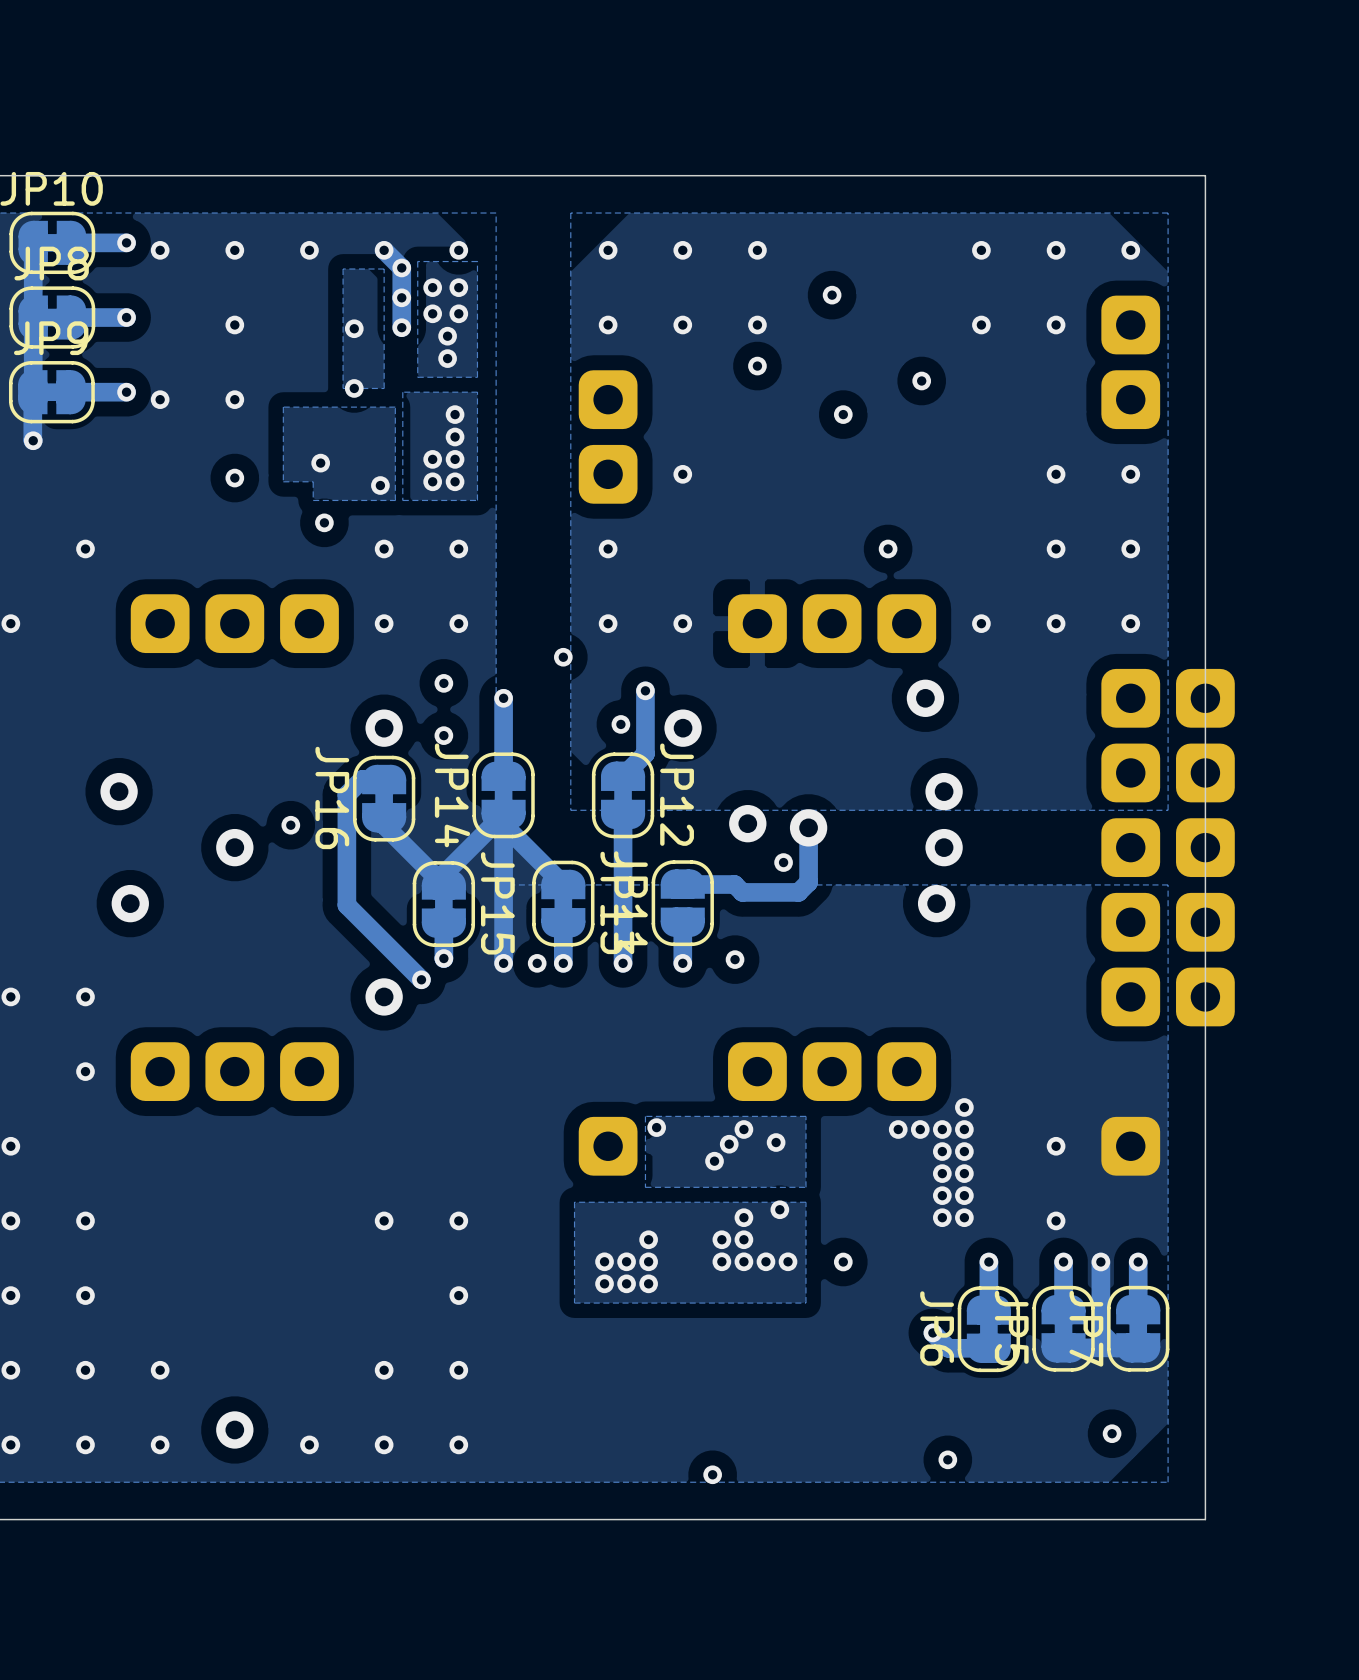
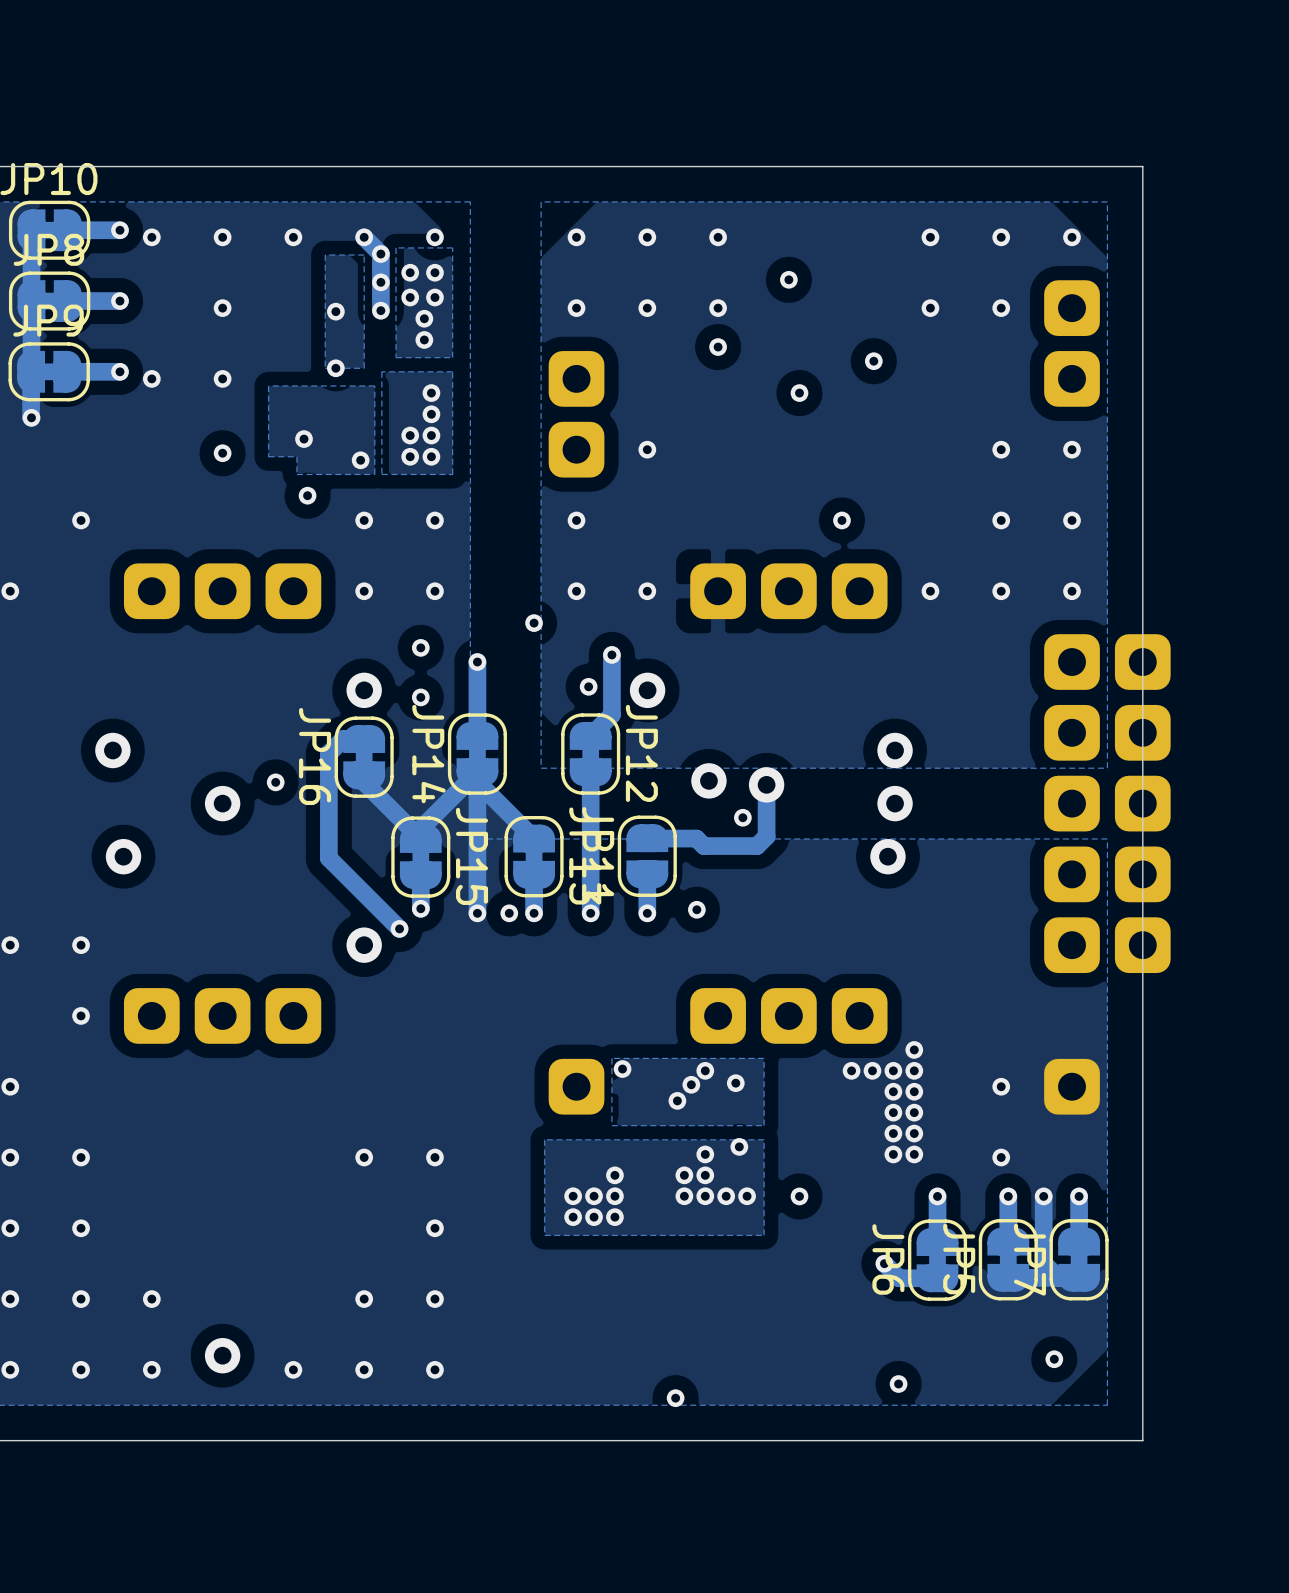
via: (925, 698) -> none

